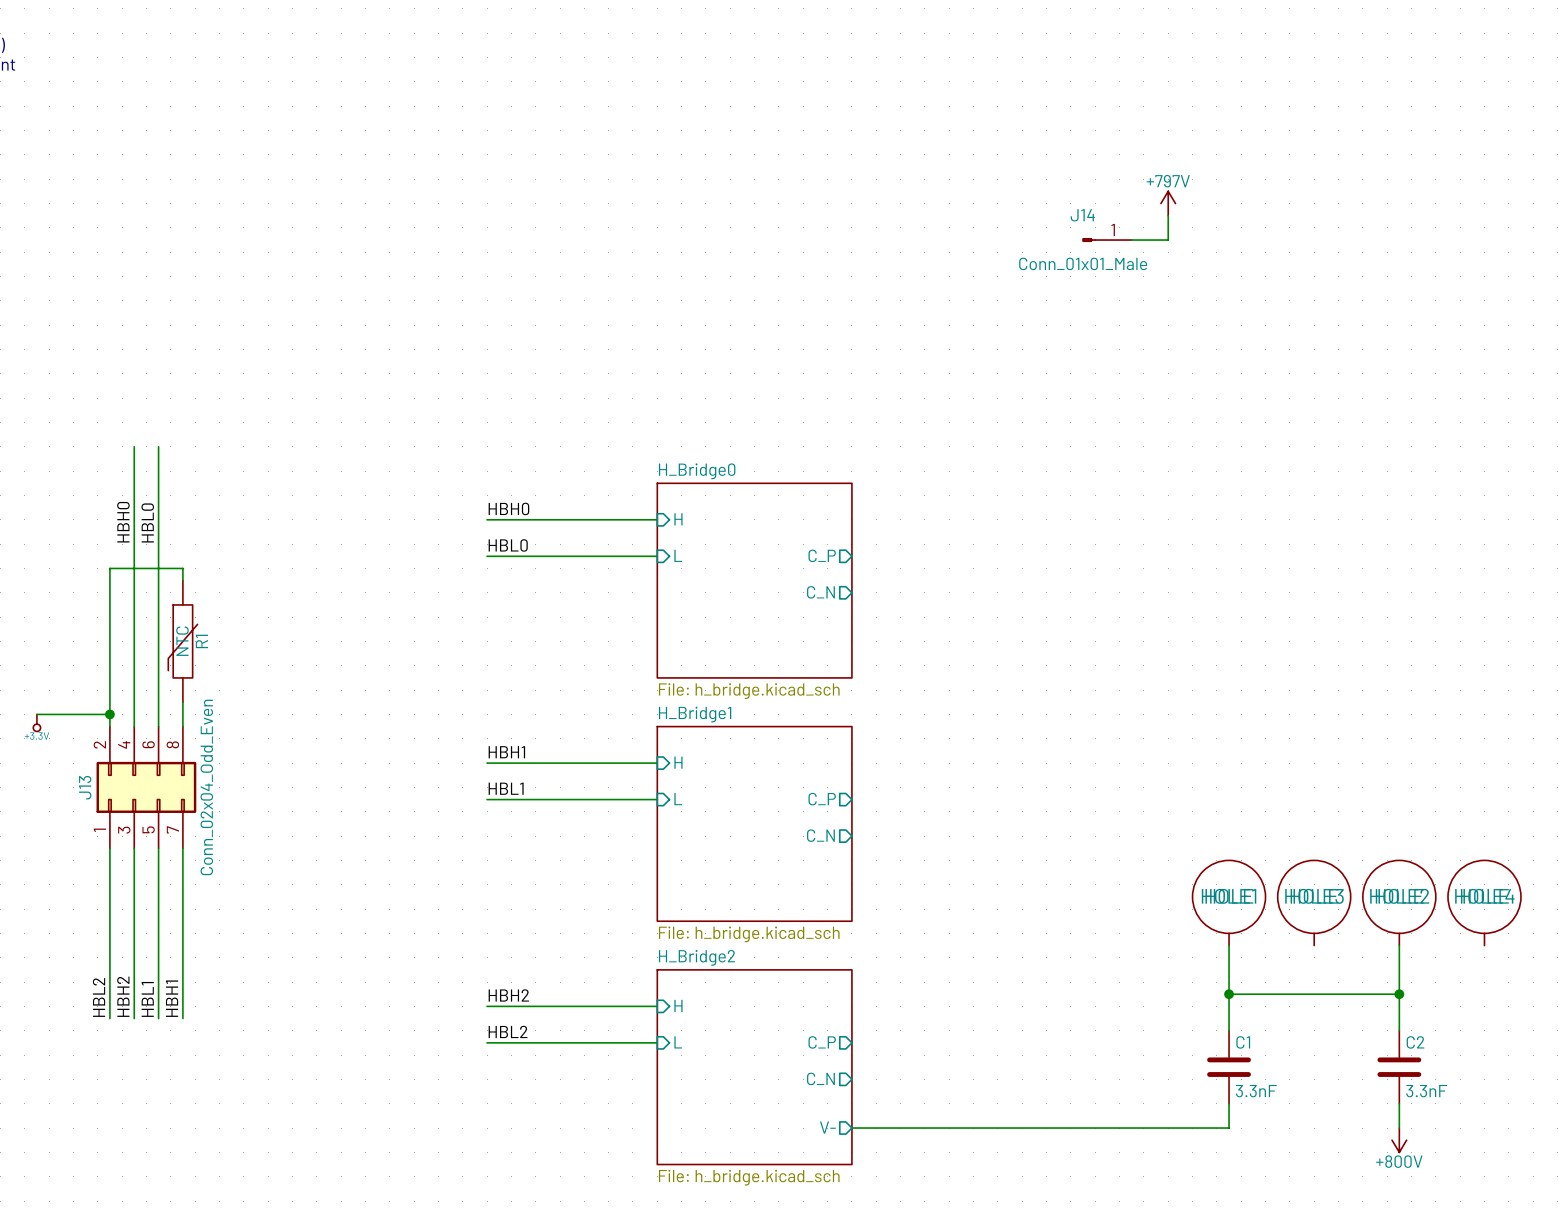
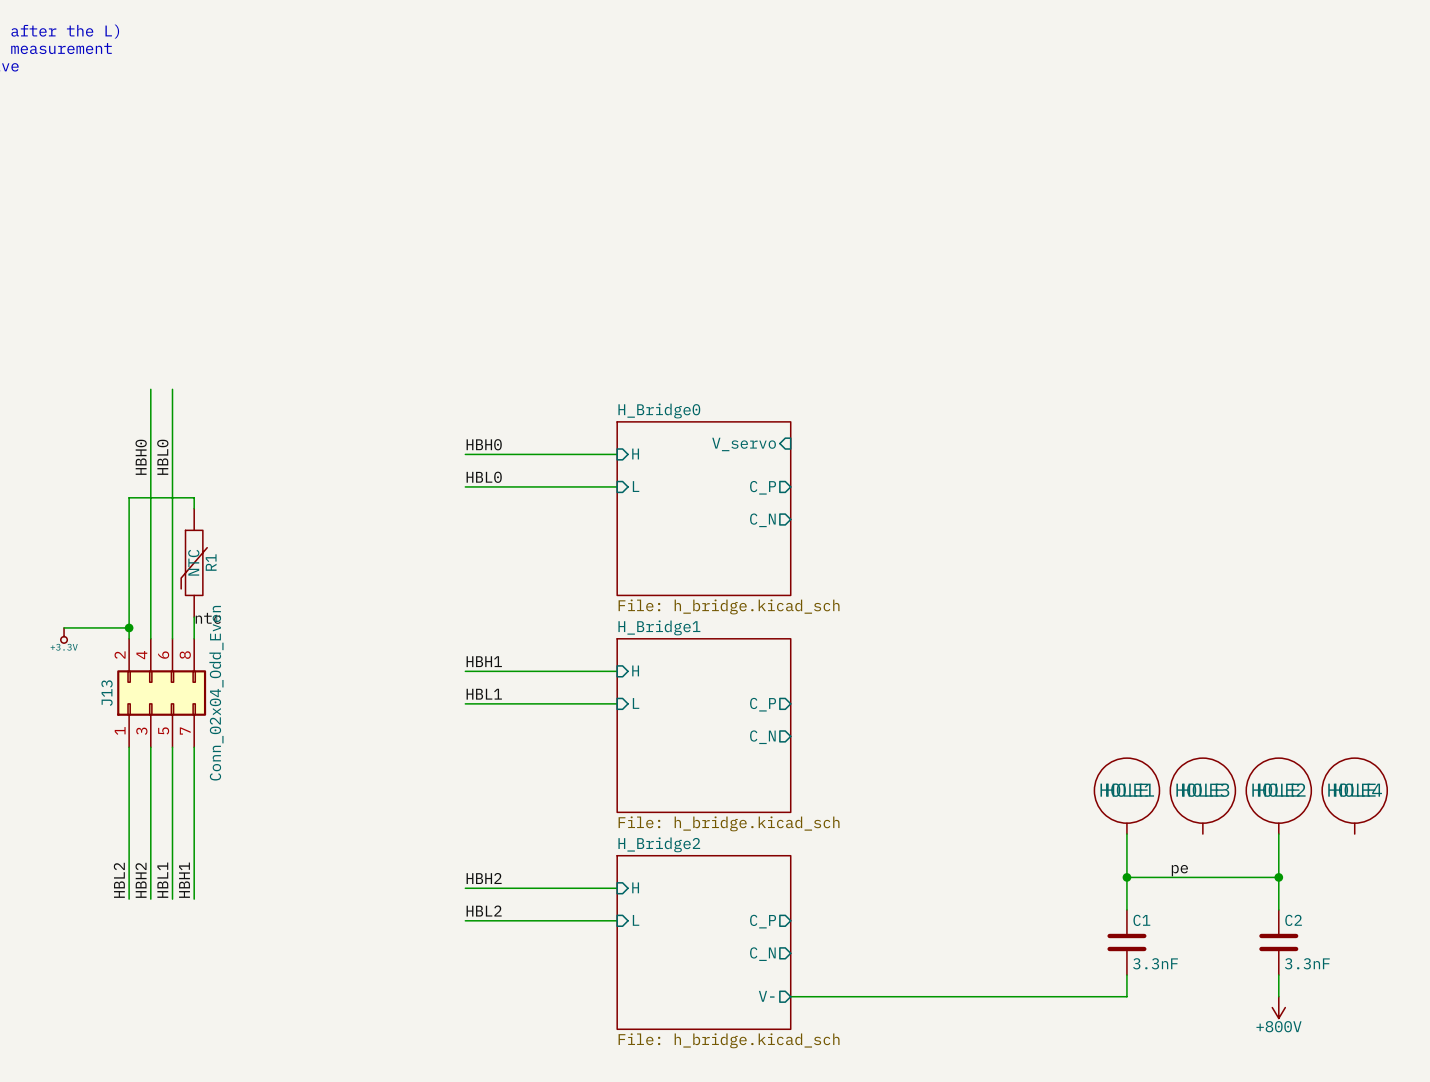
power symbol: +797V (1168, 203) -> none
wire: (1168, 215) (1168, 240) (1131, 240) -> none
J14: Conn_01x01_Male (1107, 240) -> none
sheet pin: none -> V_servo (744, 444)
label: none -> ntc (208, 618)
label: none -> pe (1179, 870)

